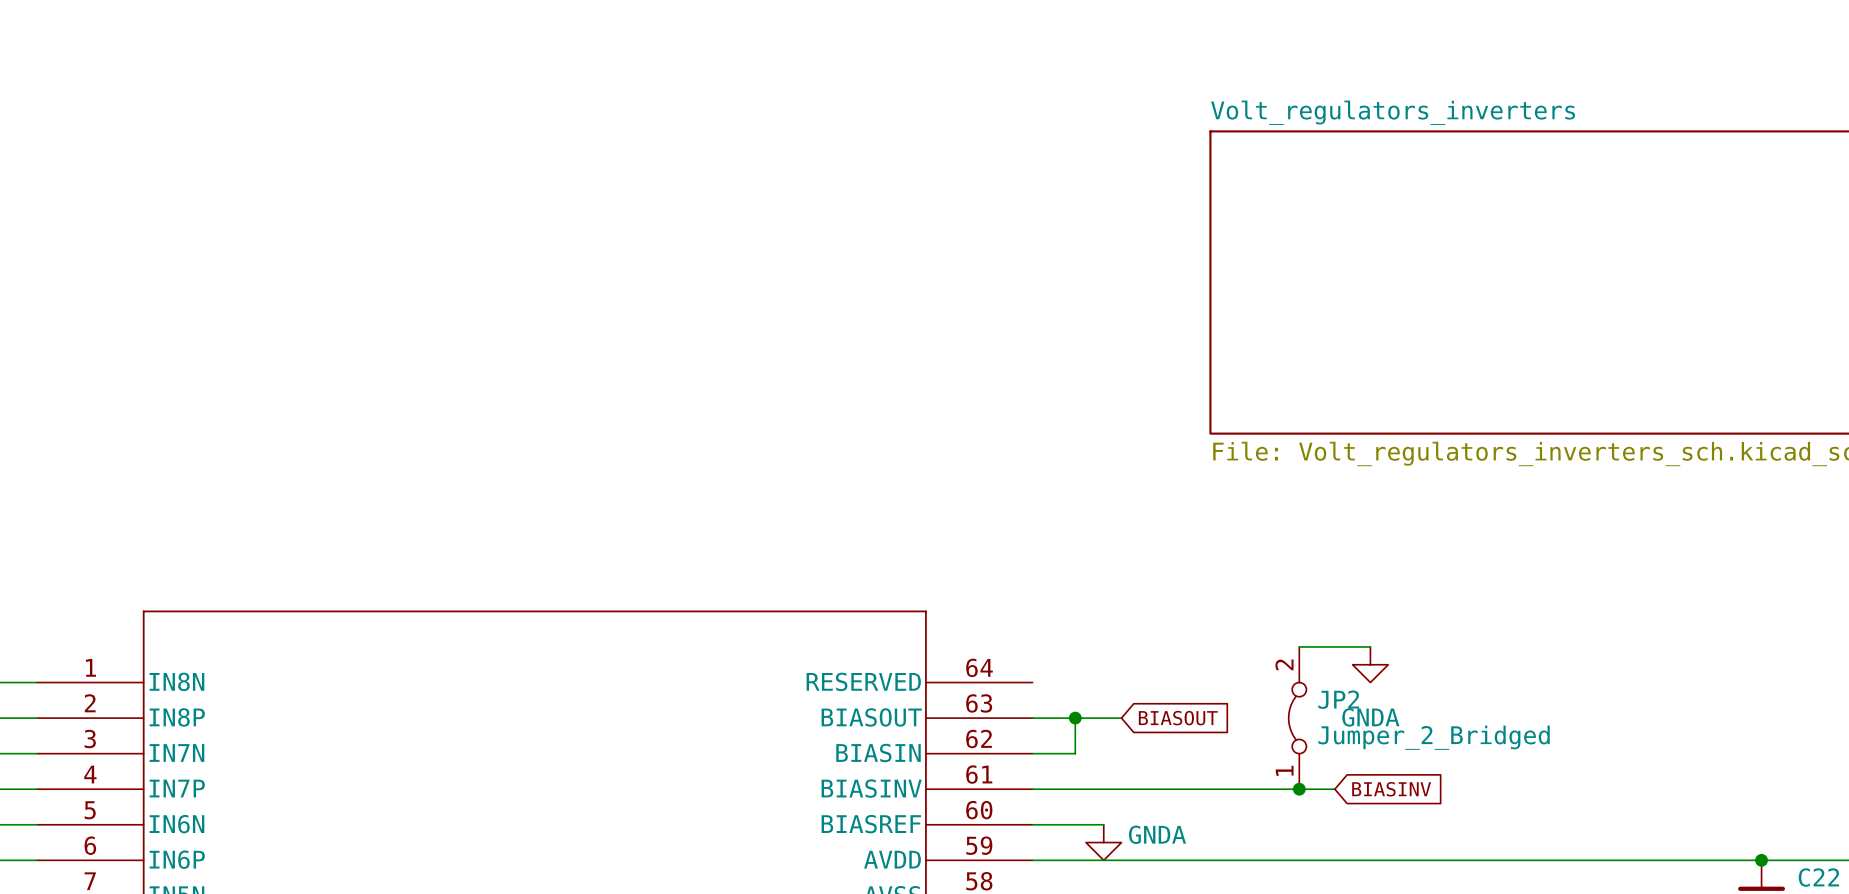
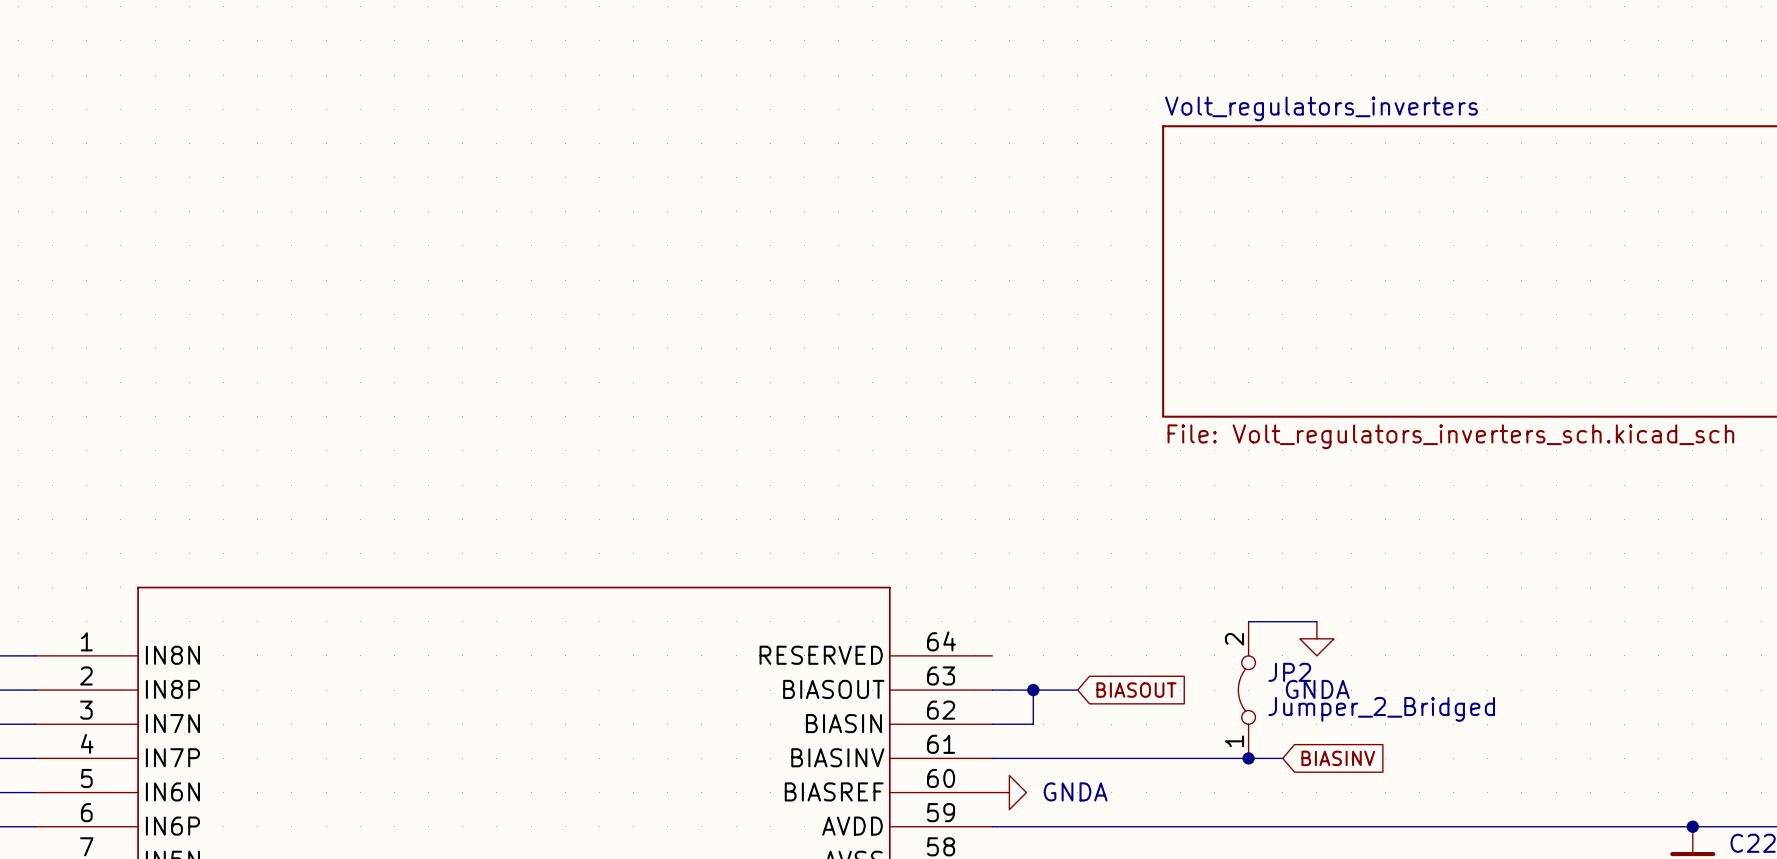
wire: (1032, 824) (1103, 824) -> none
power symbol rotation: 0° (1103, 842) -> 90° counterclockwise (1009, 792)
power symbol position: GNDA (1103, 842) -> GNDA (1009, 792)

